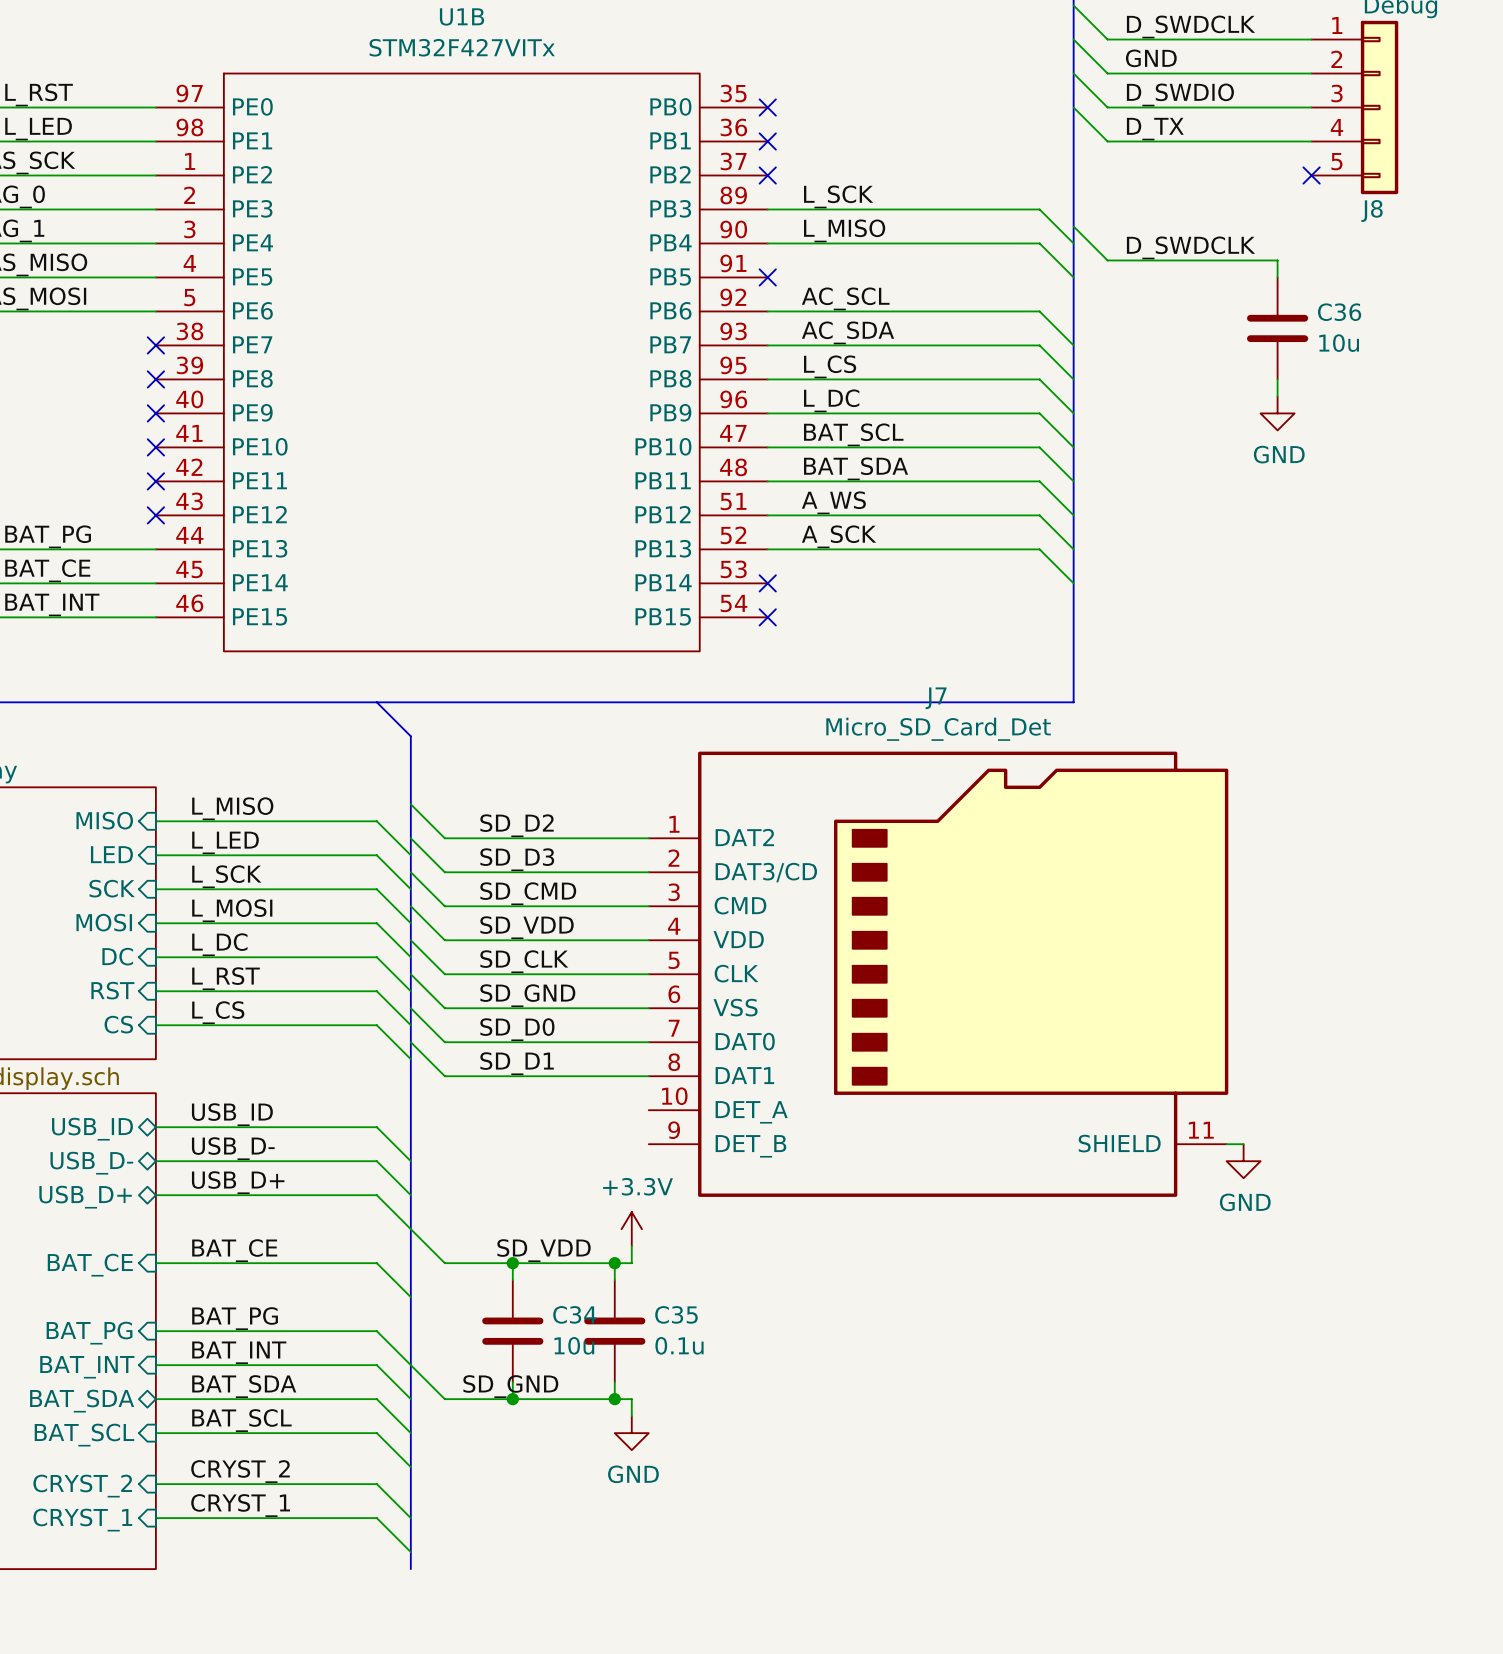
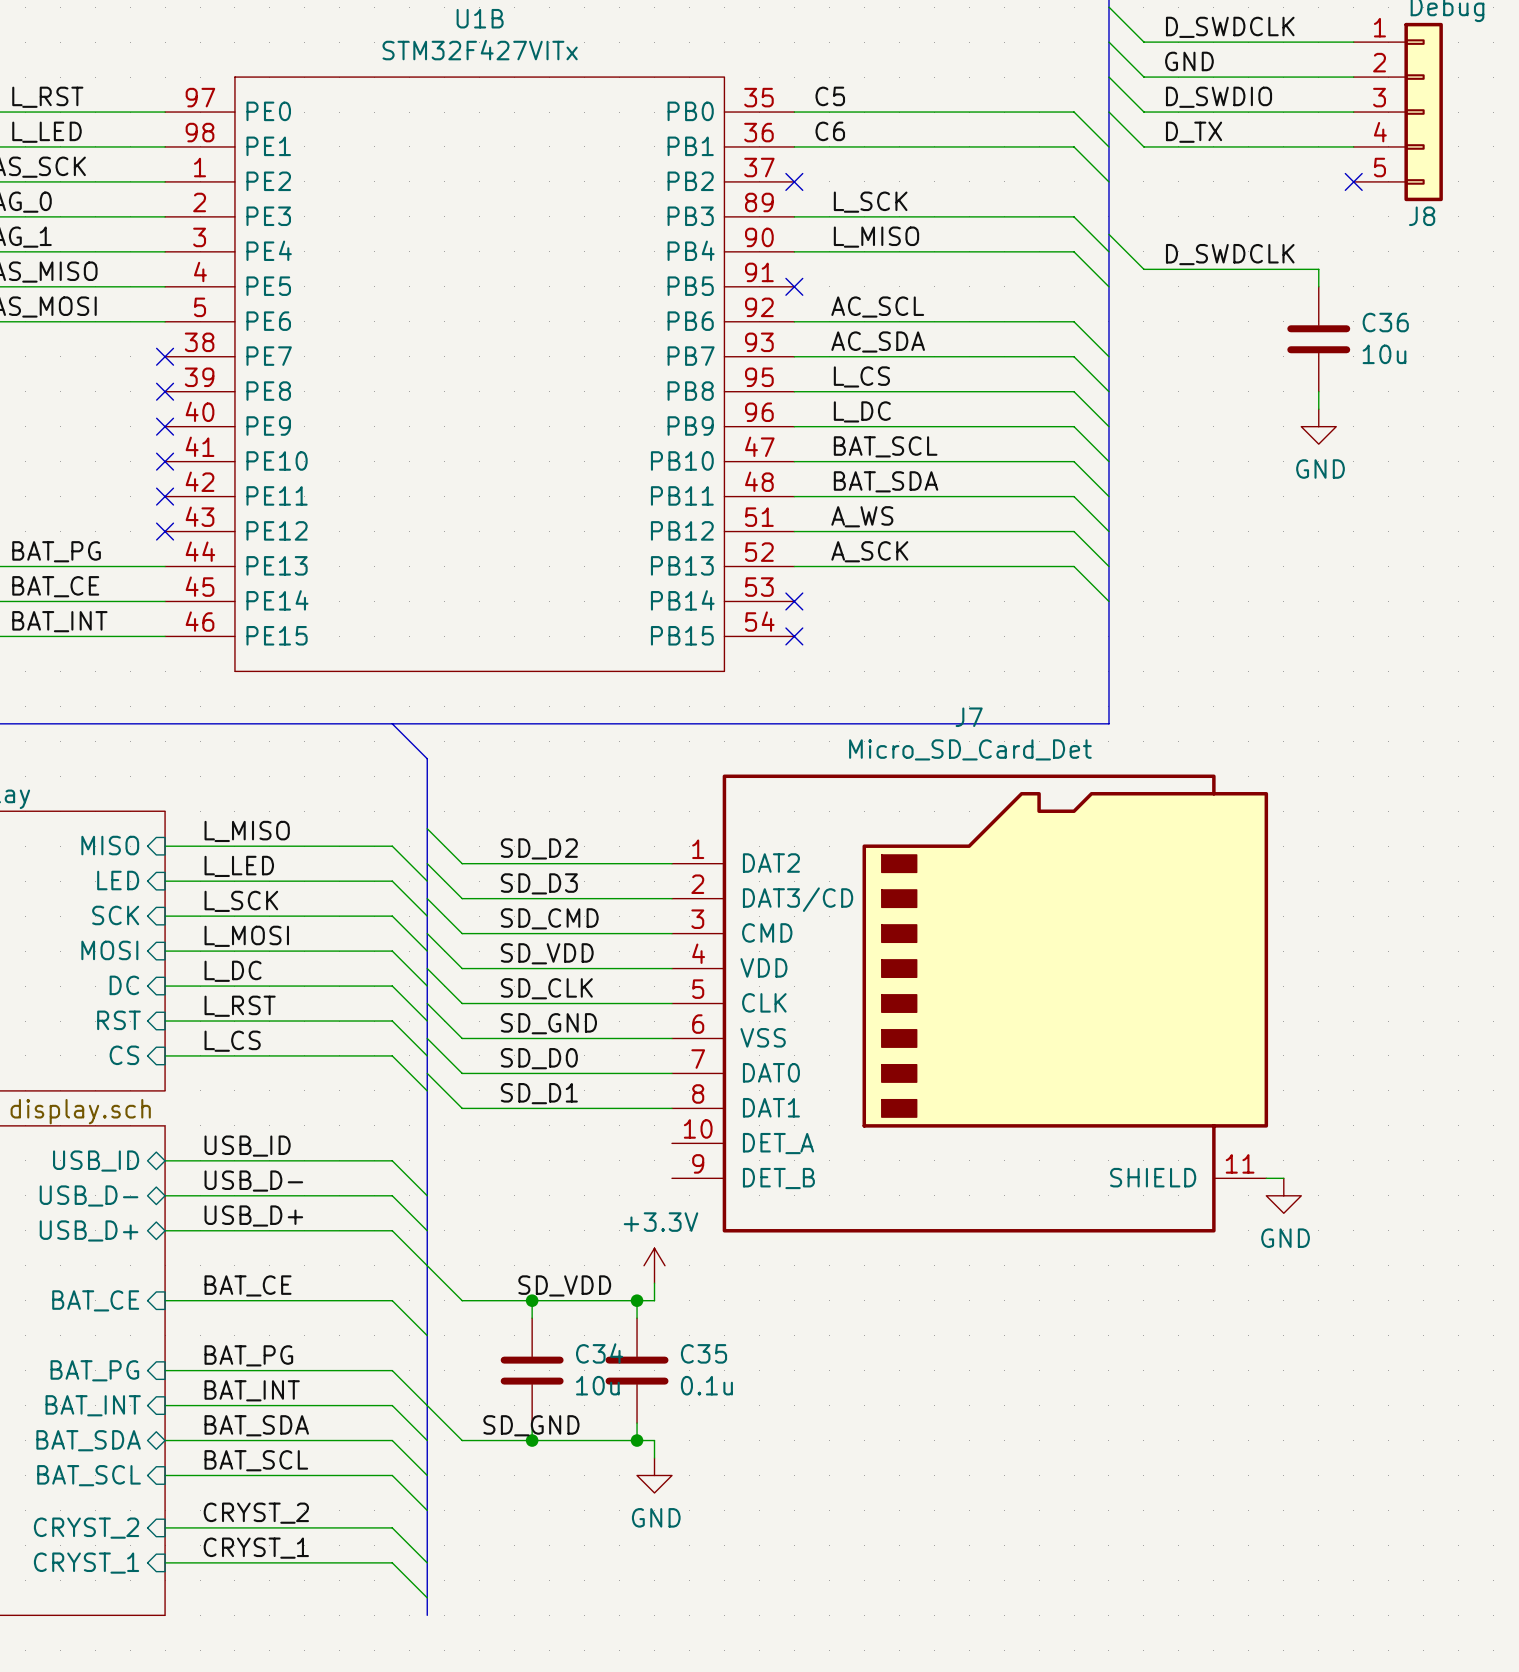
label: none -> C5 (830, 96)
wire: none -> (794, 112) (1074, 112) (1108, 146)
no-connect mark: (767, 107) -> none
label: none -> C6 (830, 131)
wire: none -> (794, 146) (1074, 146) (1108, 181)
no-connect mark: (767, 141) -> none

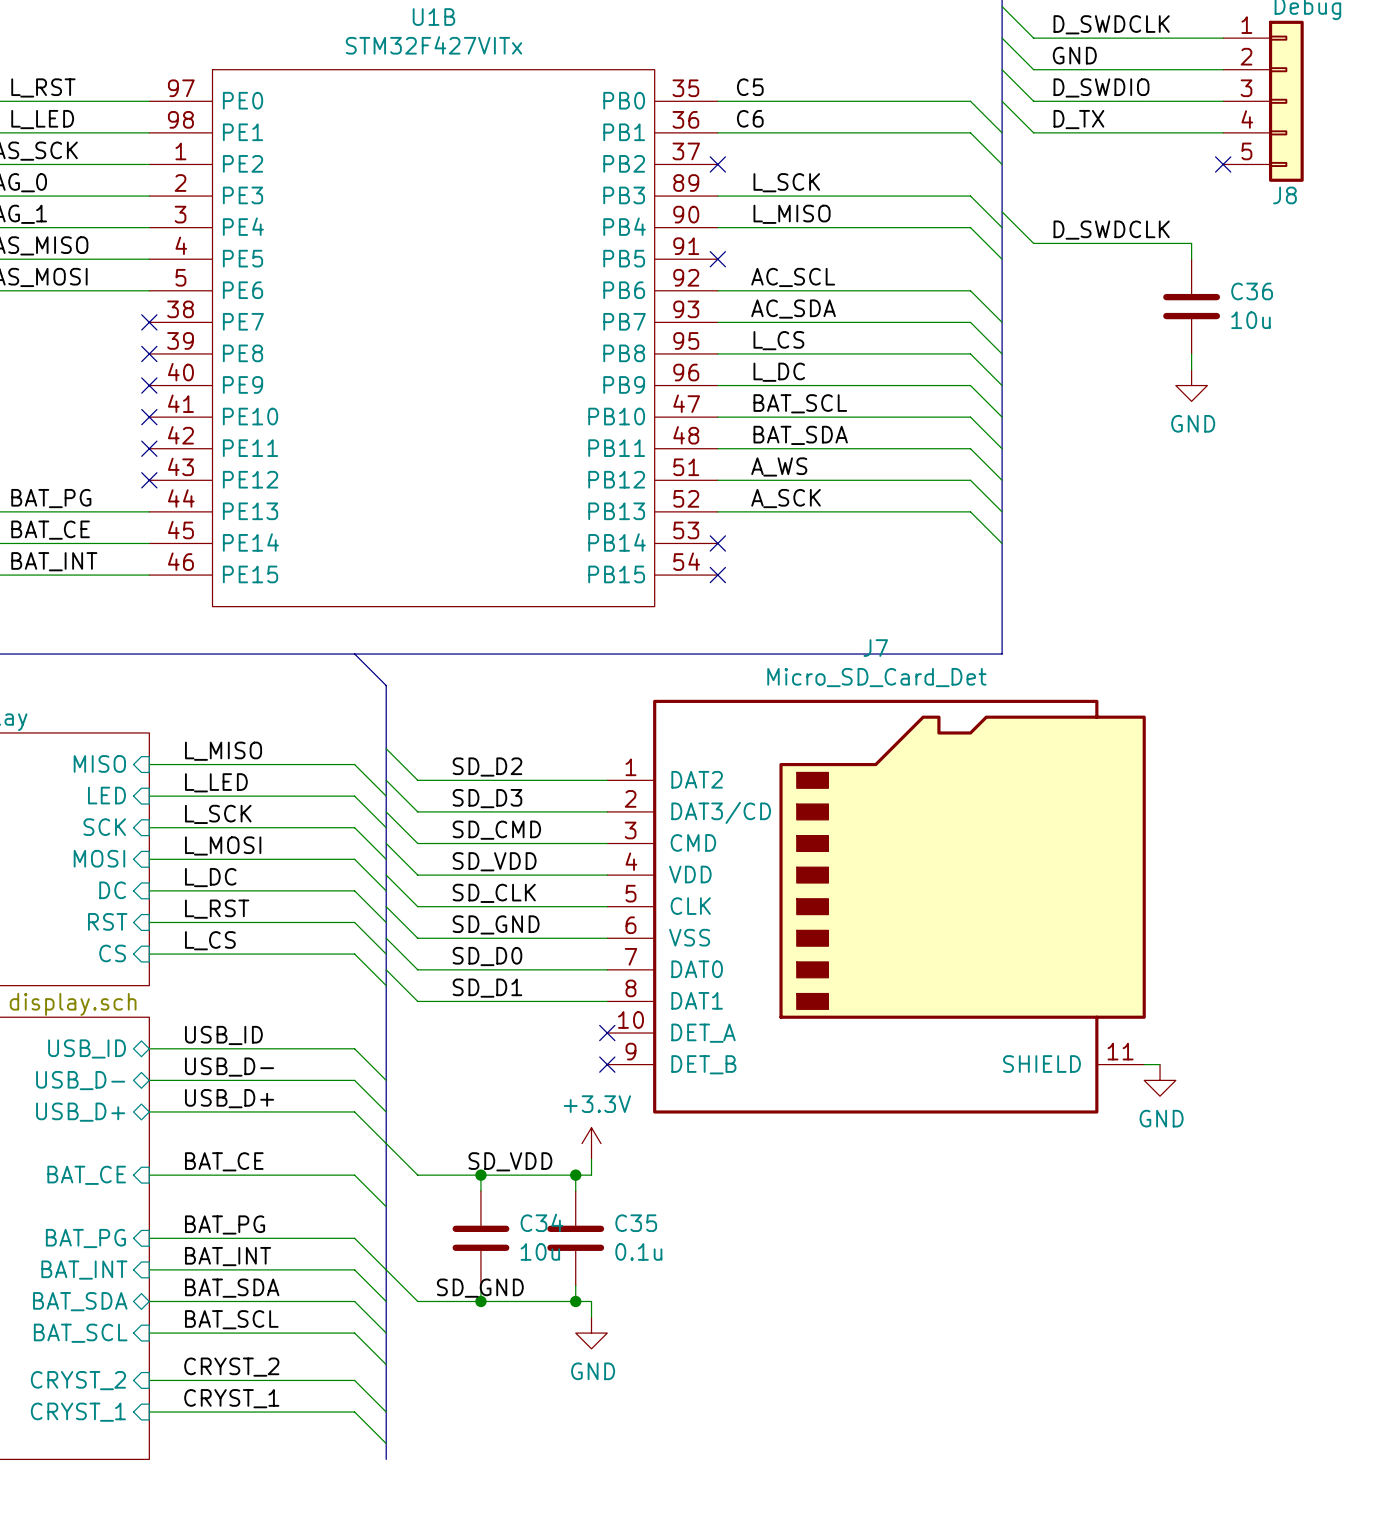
no-connect mark: none -> (607, 1033)
no-connect mark: none -> (607, 1064)

